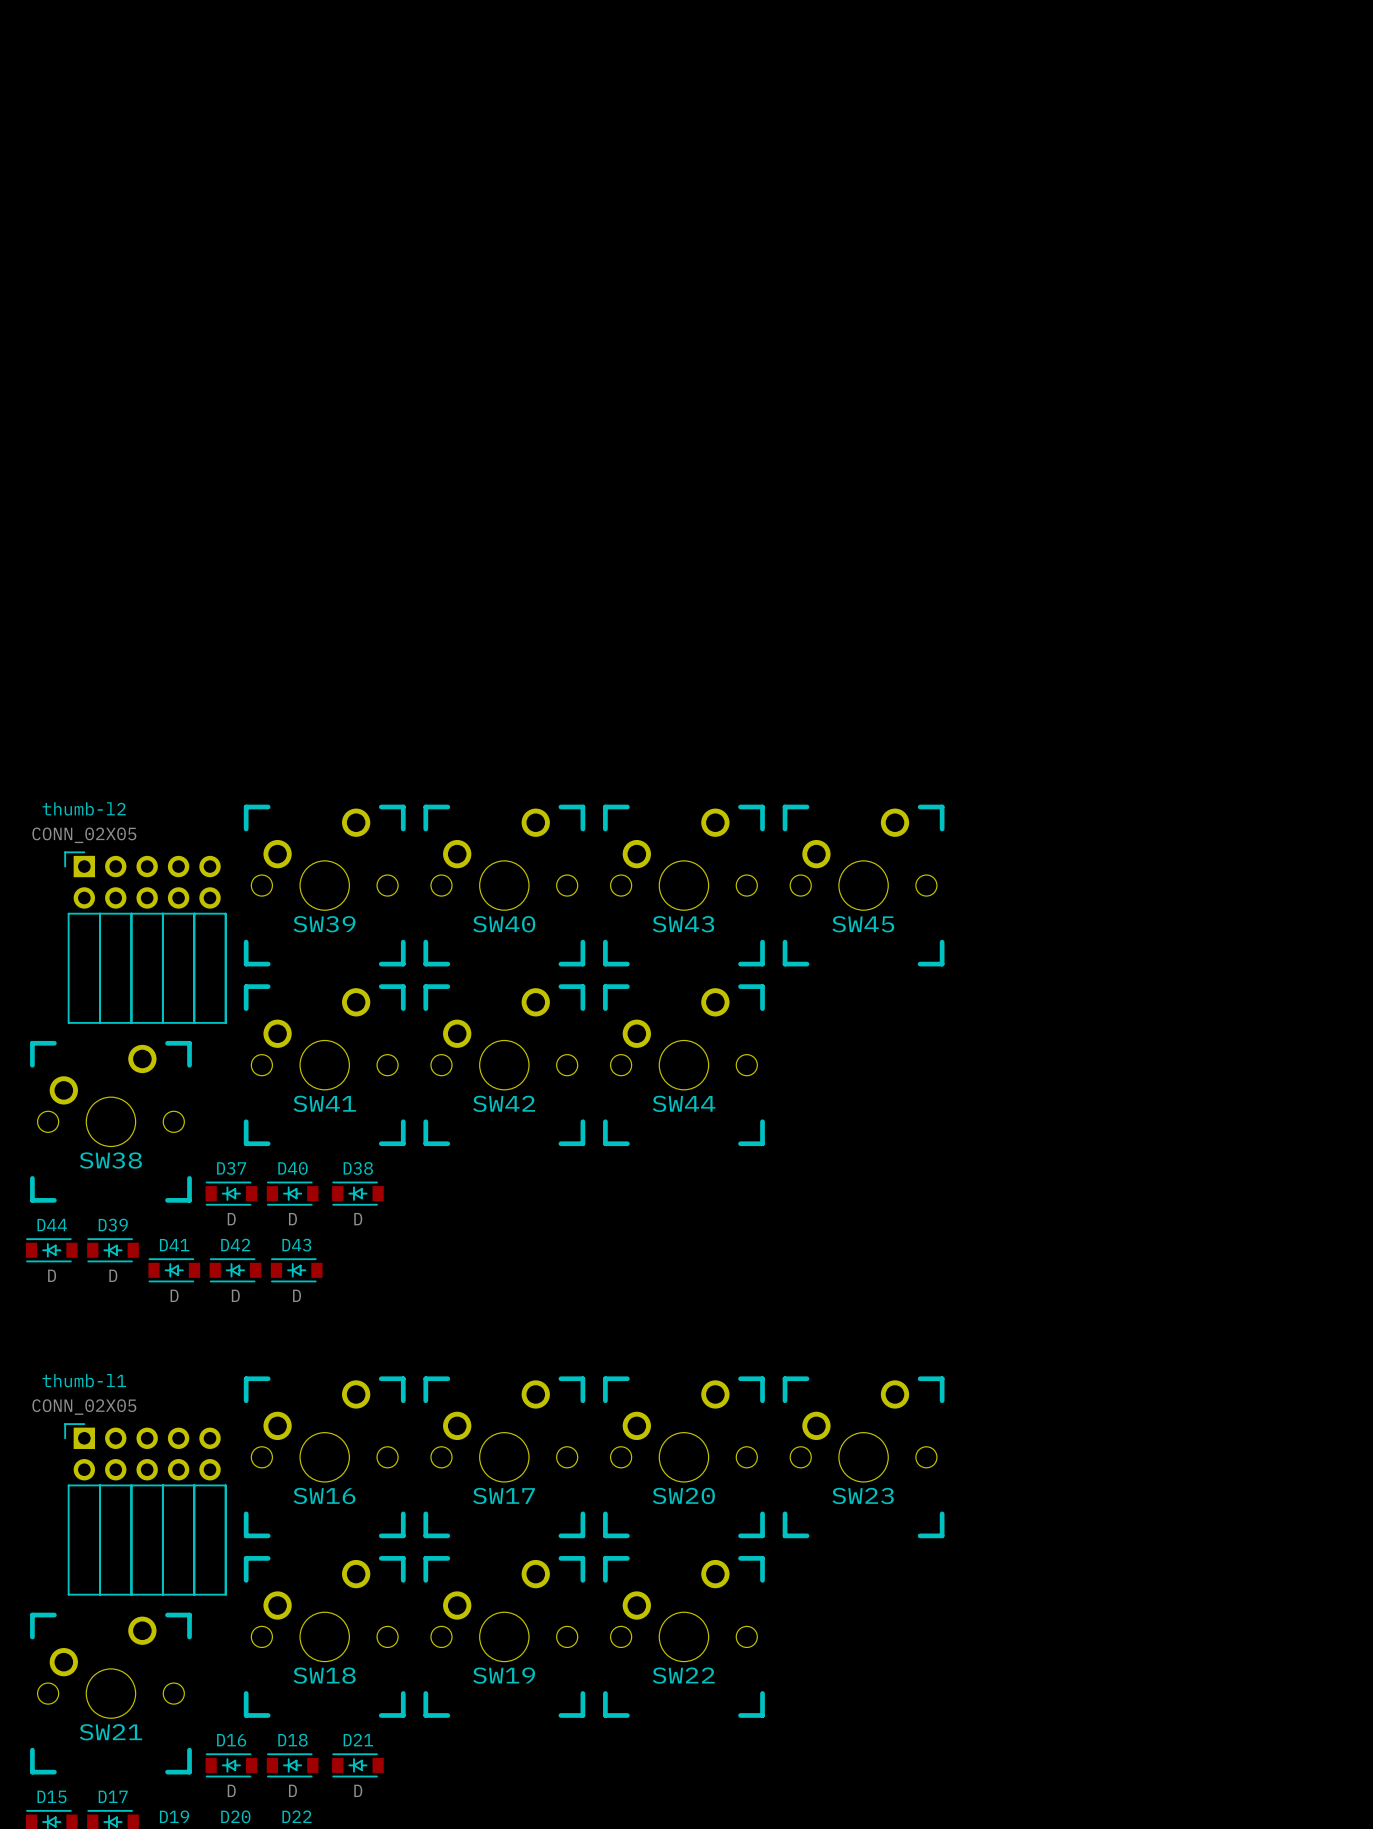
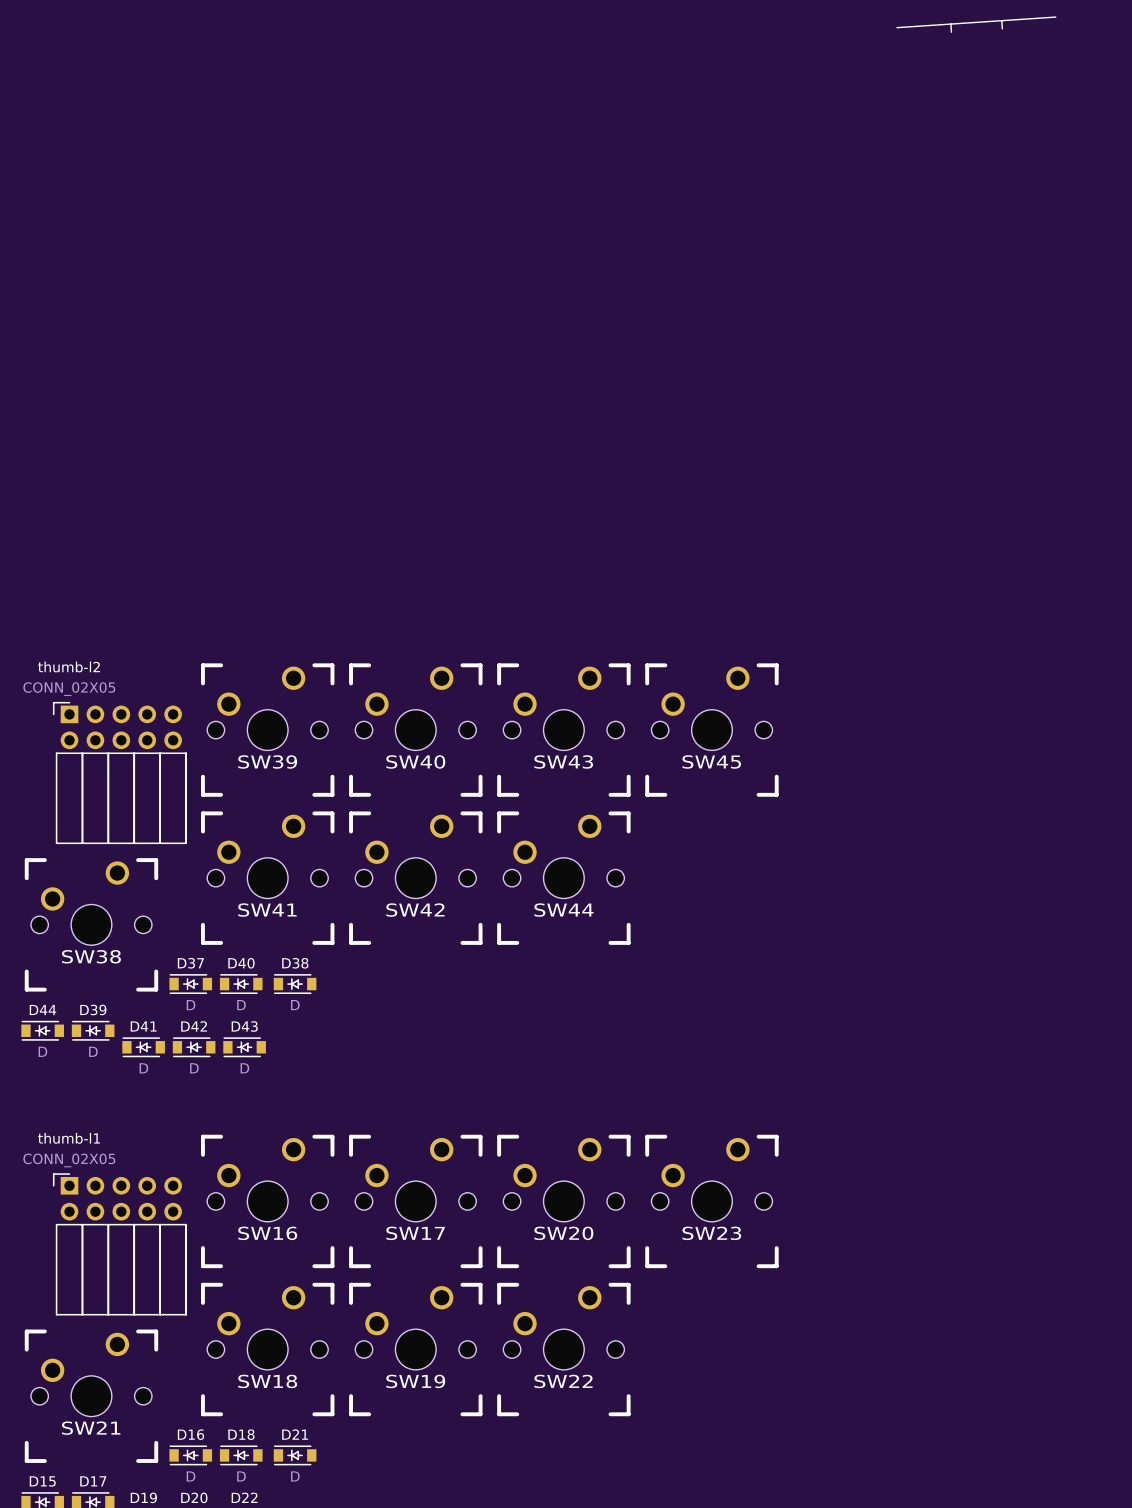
line: none -> (1055, 17) (896, 27)
line: none -> (1001, 20) (1002, 28)
line: none -> (950, 24) (951, 32)

